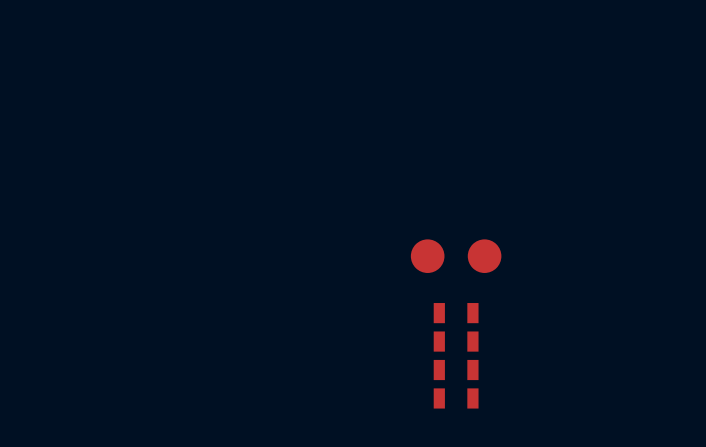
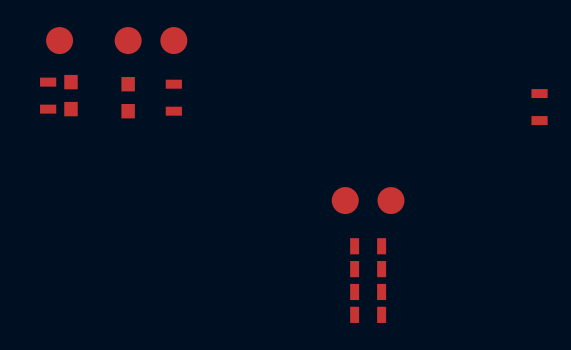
part: none -> (59, 40)
part: none -> (128, 40)
part: none -> (173, 40)
part: none -> (48, 95)
part: none -> (70, 95)
part: none -> (128, 97)
part: none -> (173, 97)
part: none -> (539, 107)

